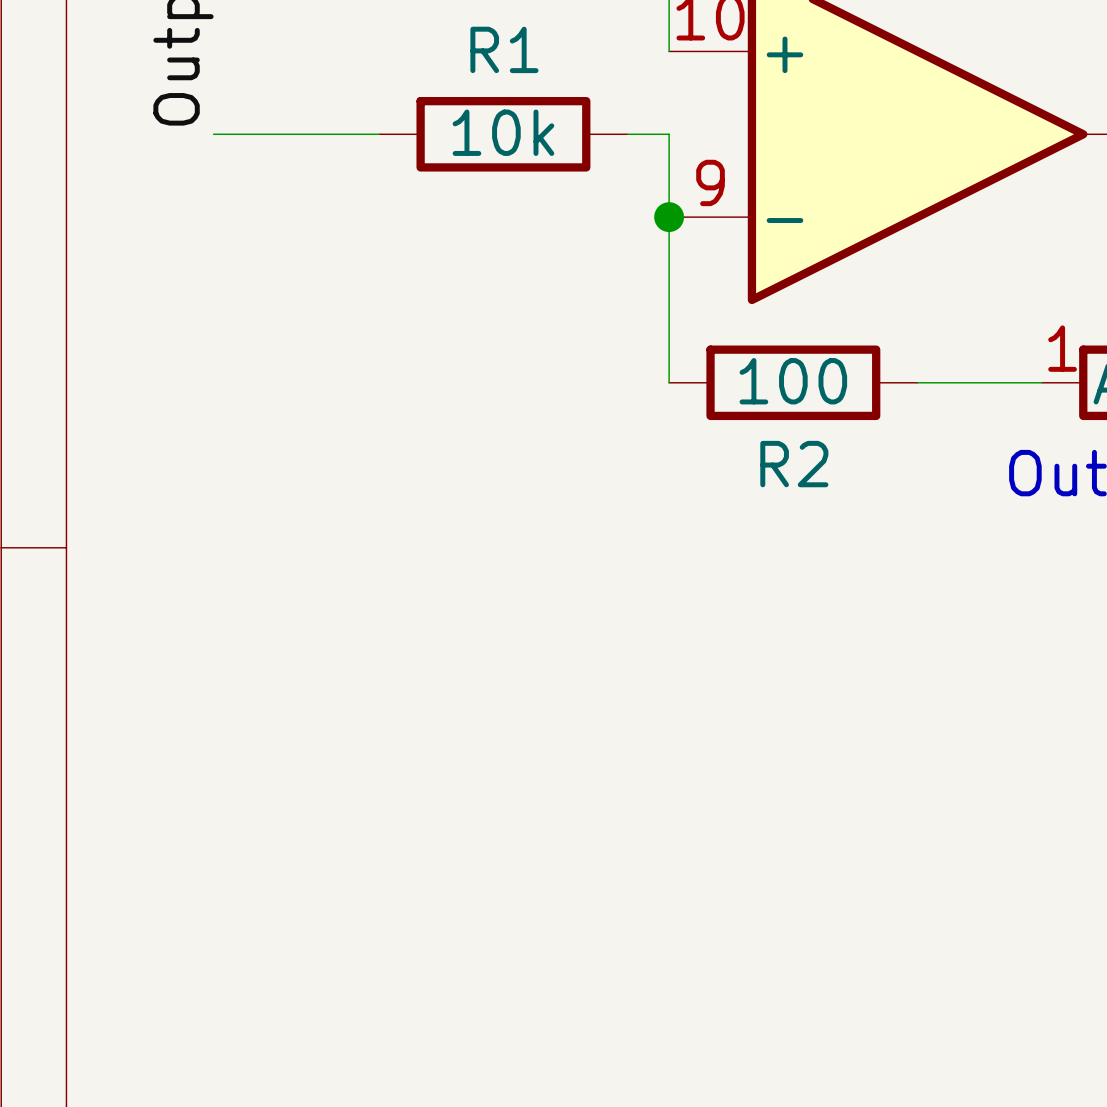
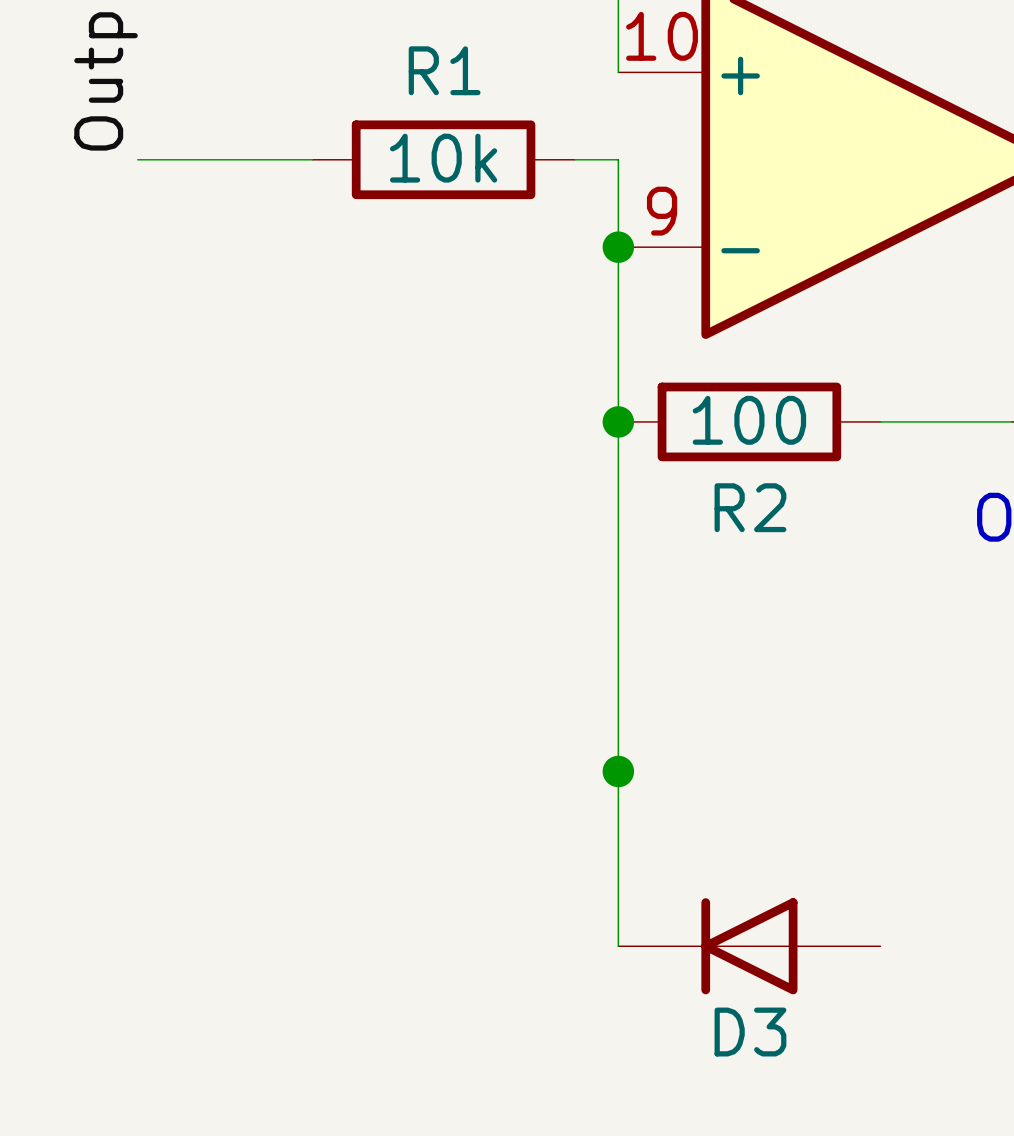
wire: none -> (618, 421) (618, 946)
junction: none -> (618, 421)
junction: none -> (618, 771)
D3: none -> (749, 946)

